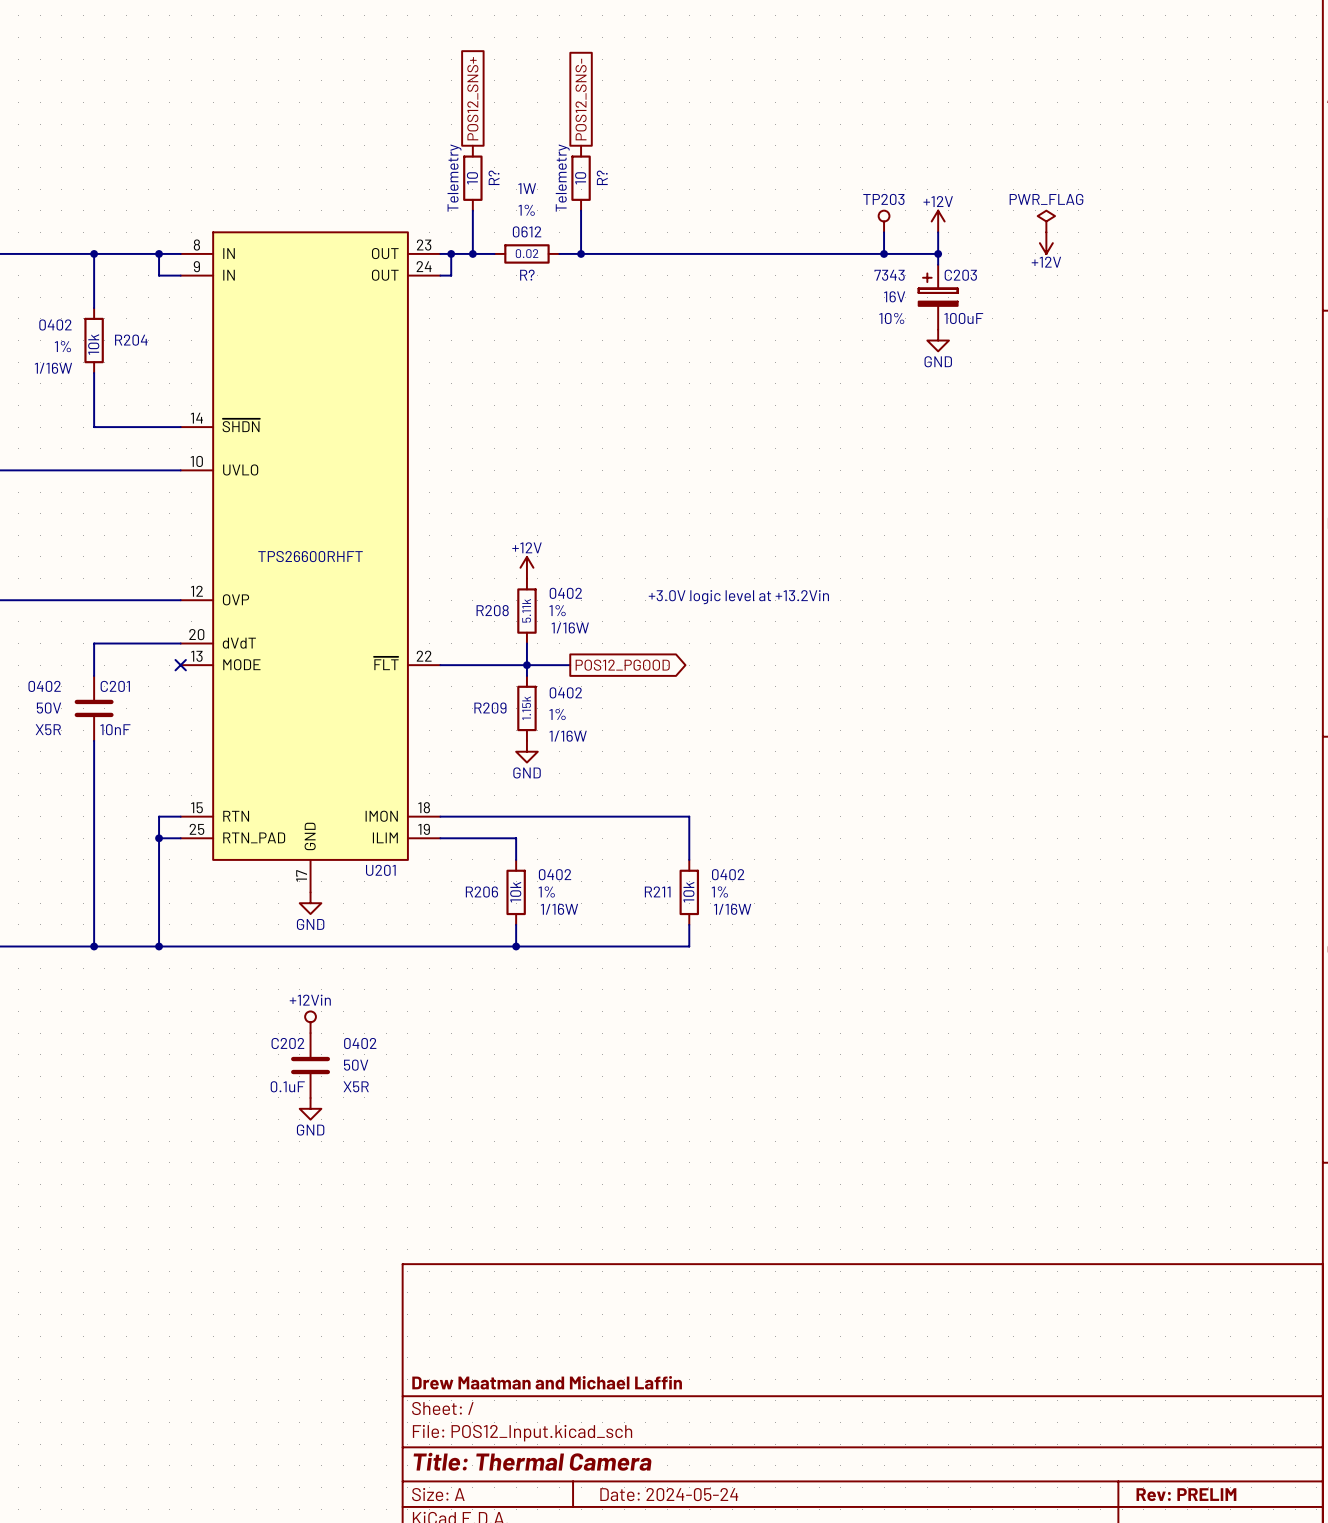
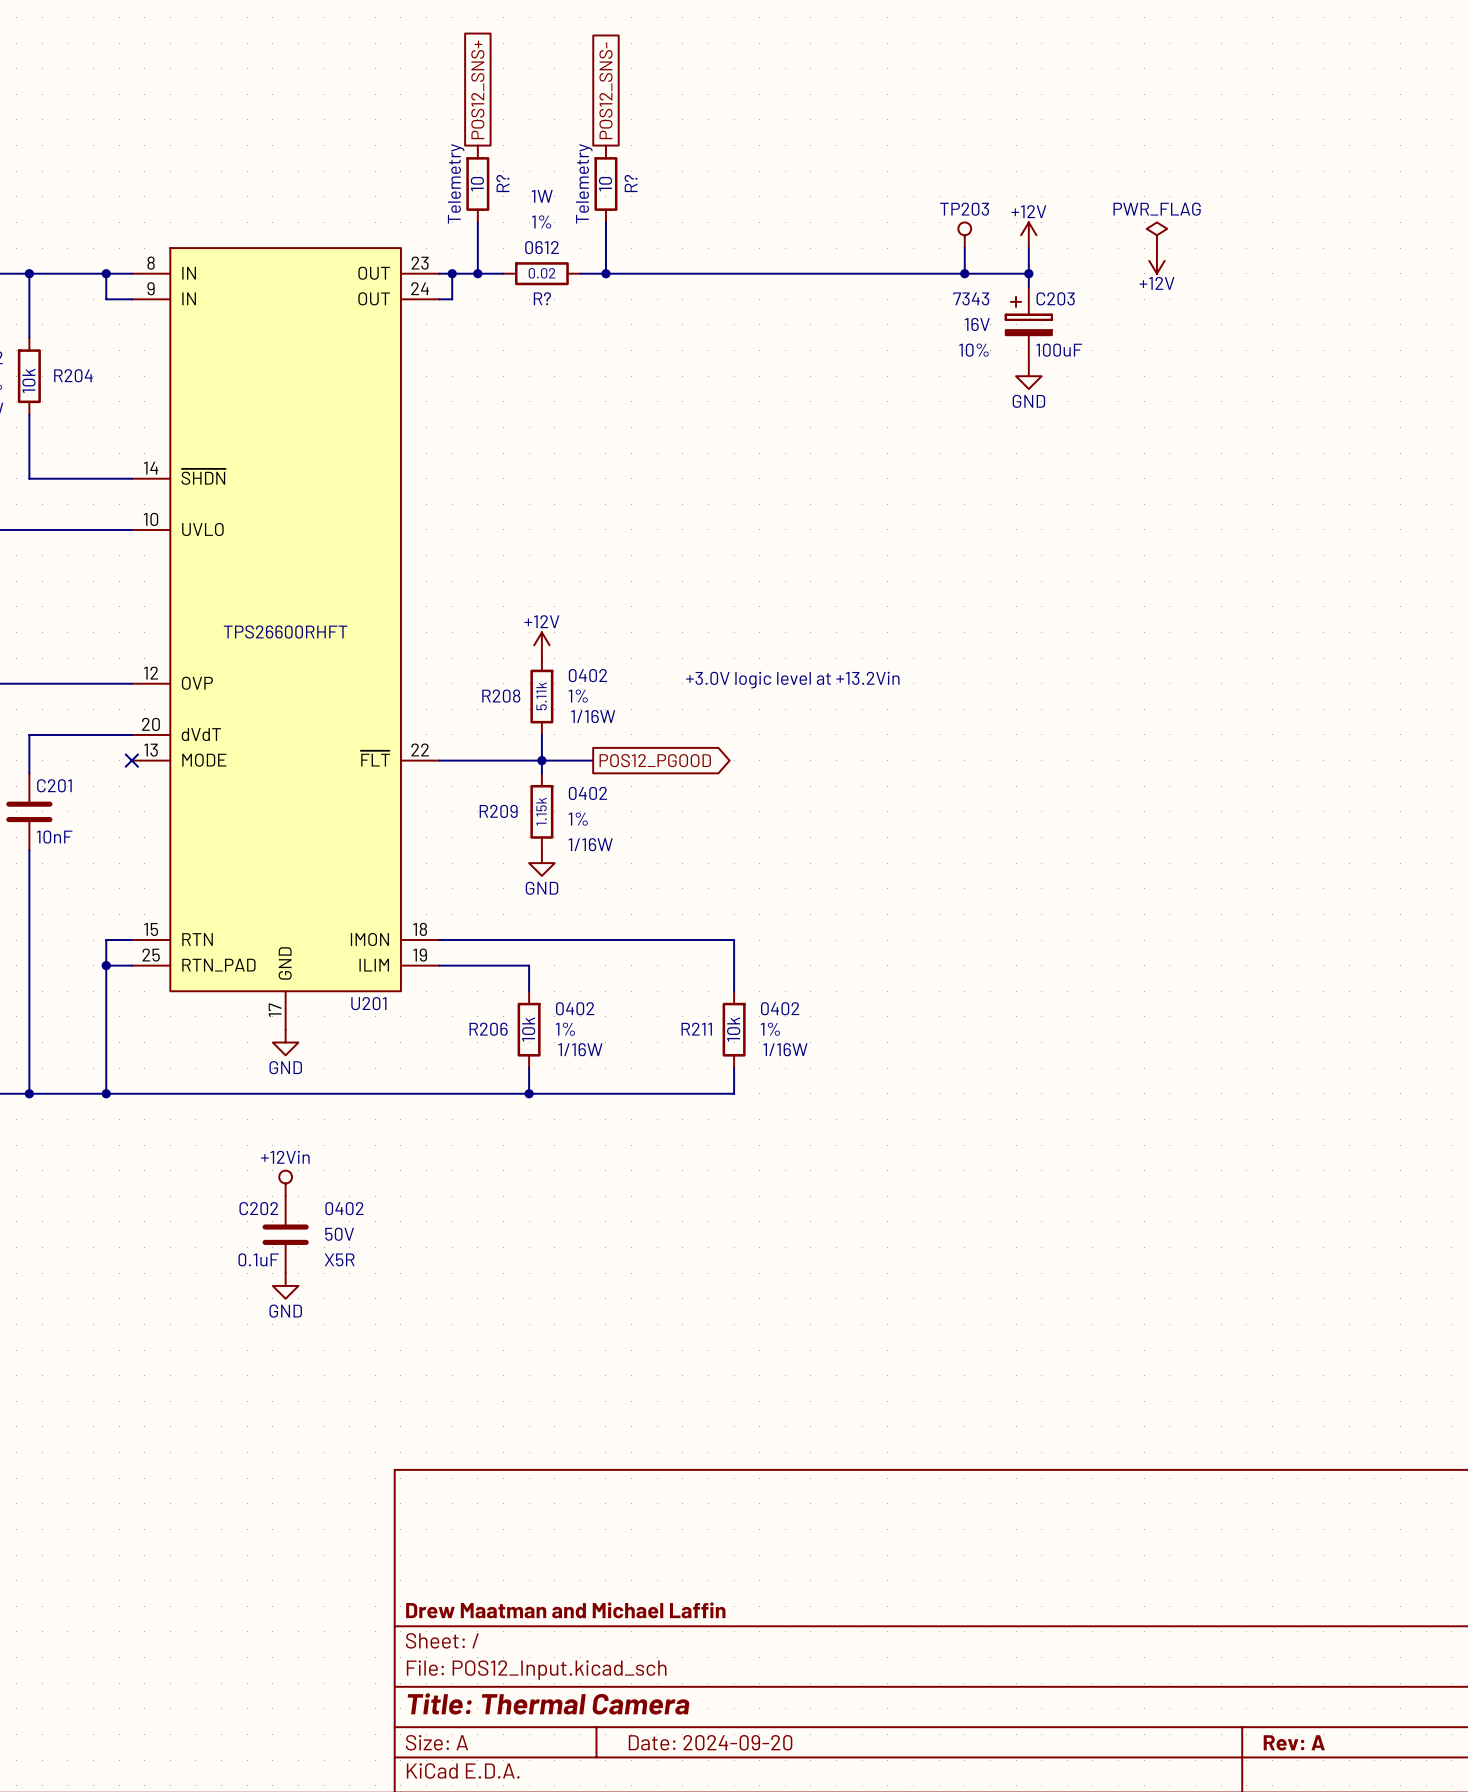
title block: Date: 2024-05-24 (669, 1494) -> Date: 2024-09-20 (710, 1742)
title block: Rev: PRELIM (1186, 1494) -> Rev: A (1294, 1742)

